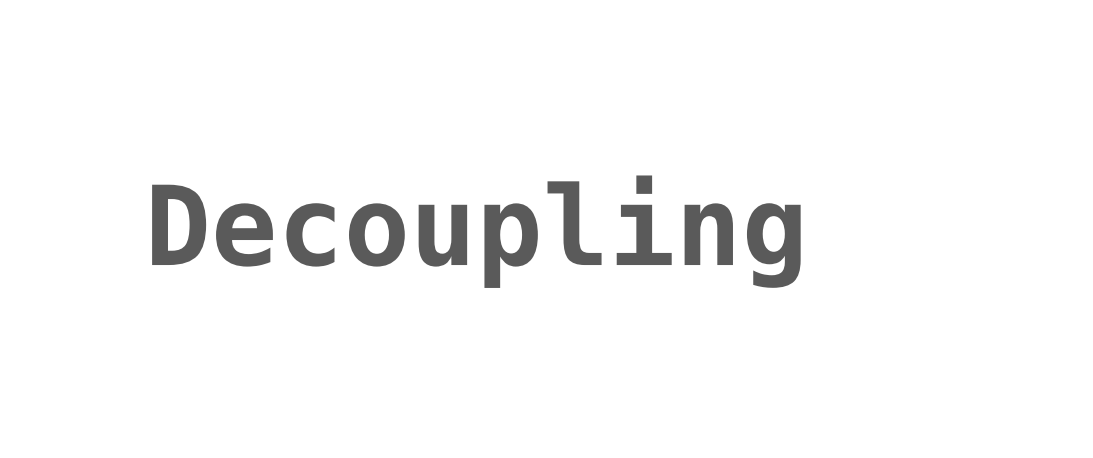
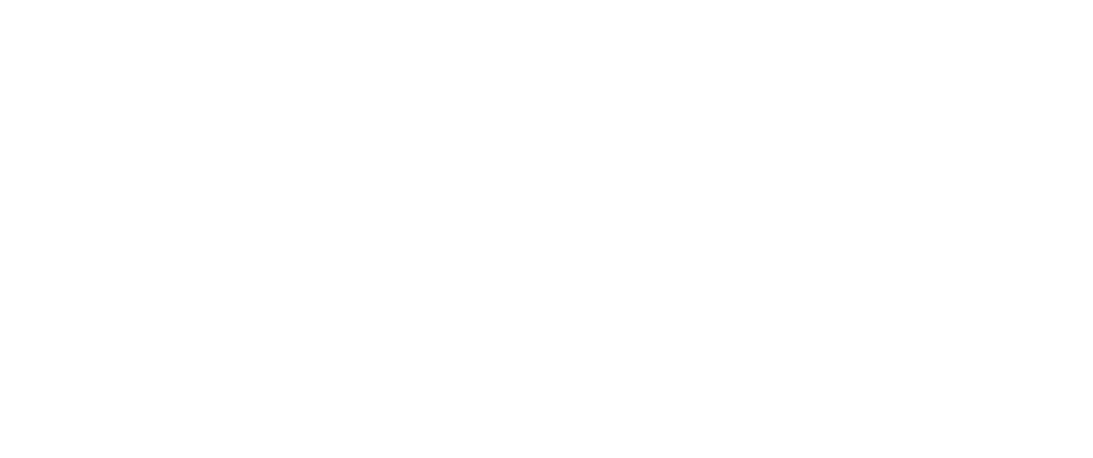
text: Decoupling (476, 231) -> none

